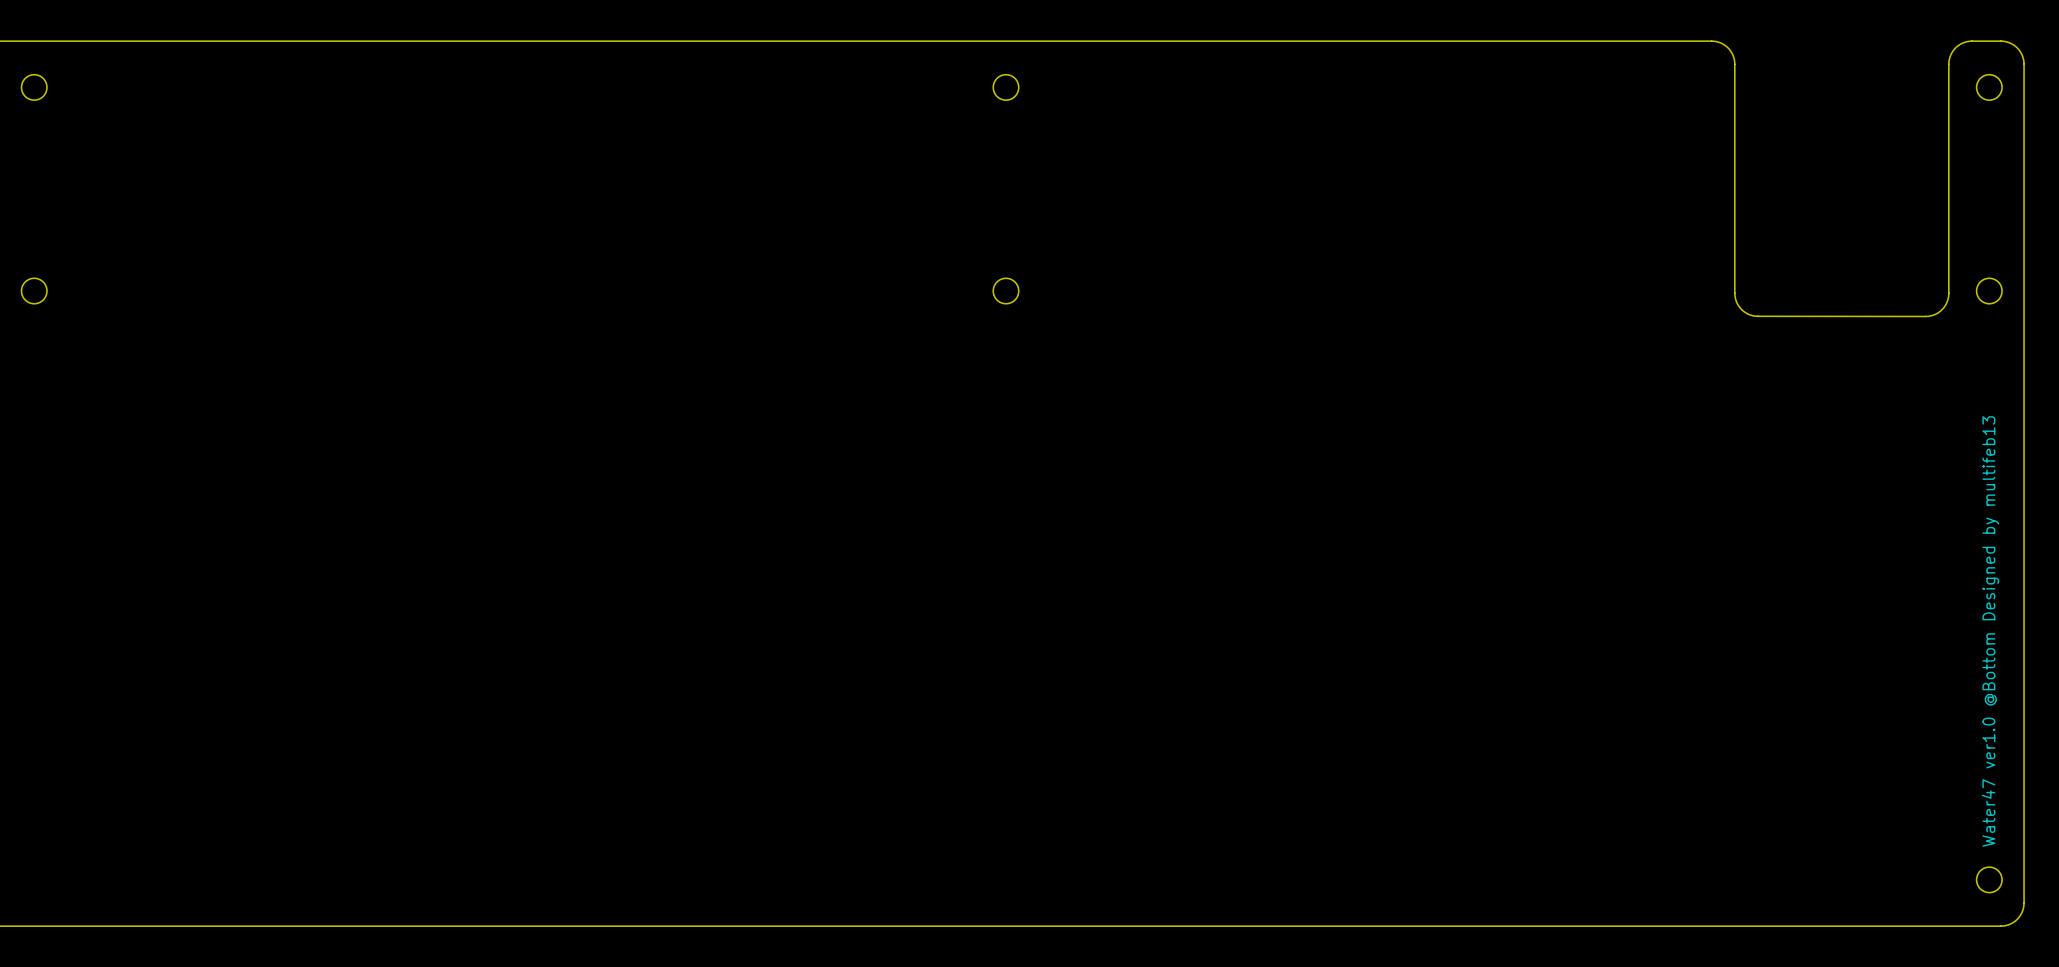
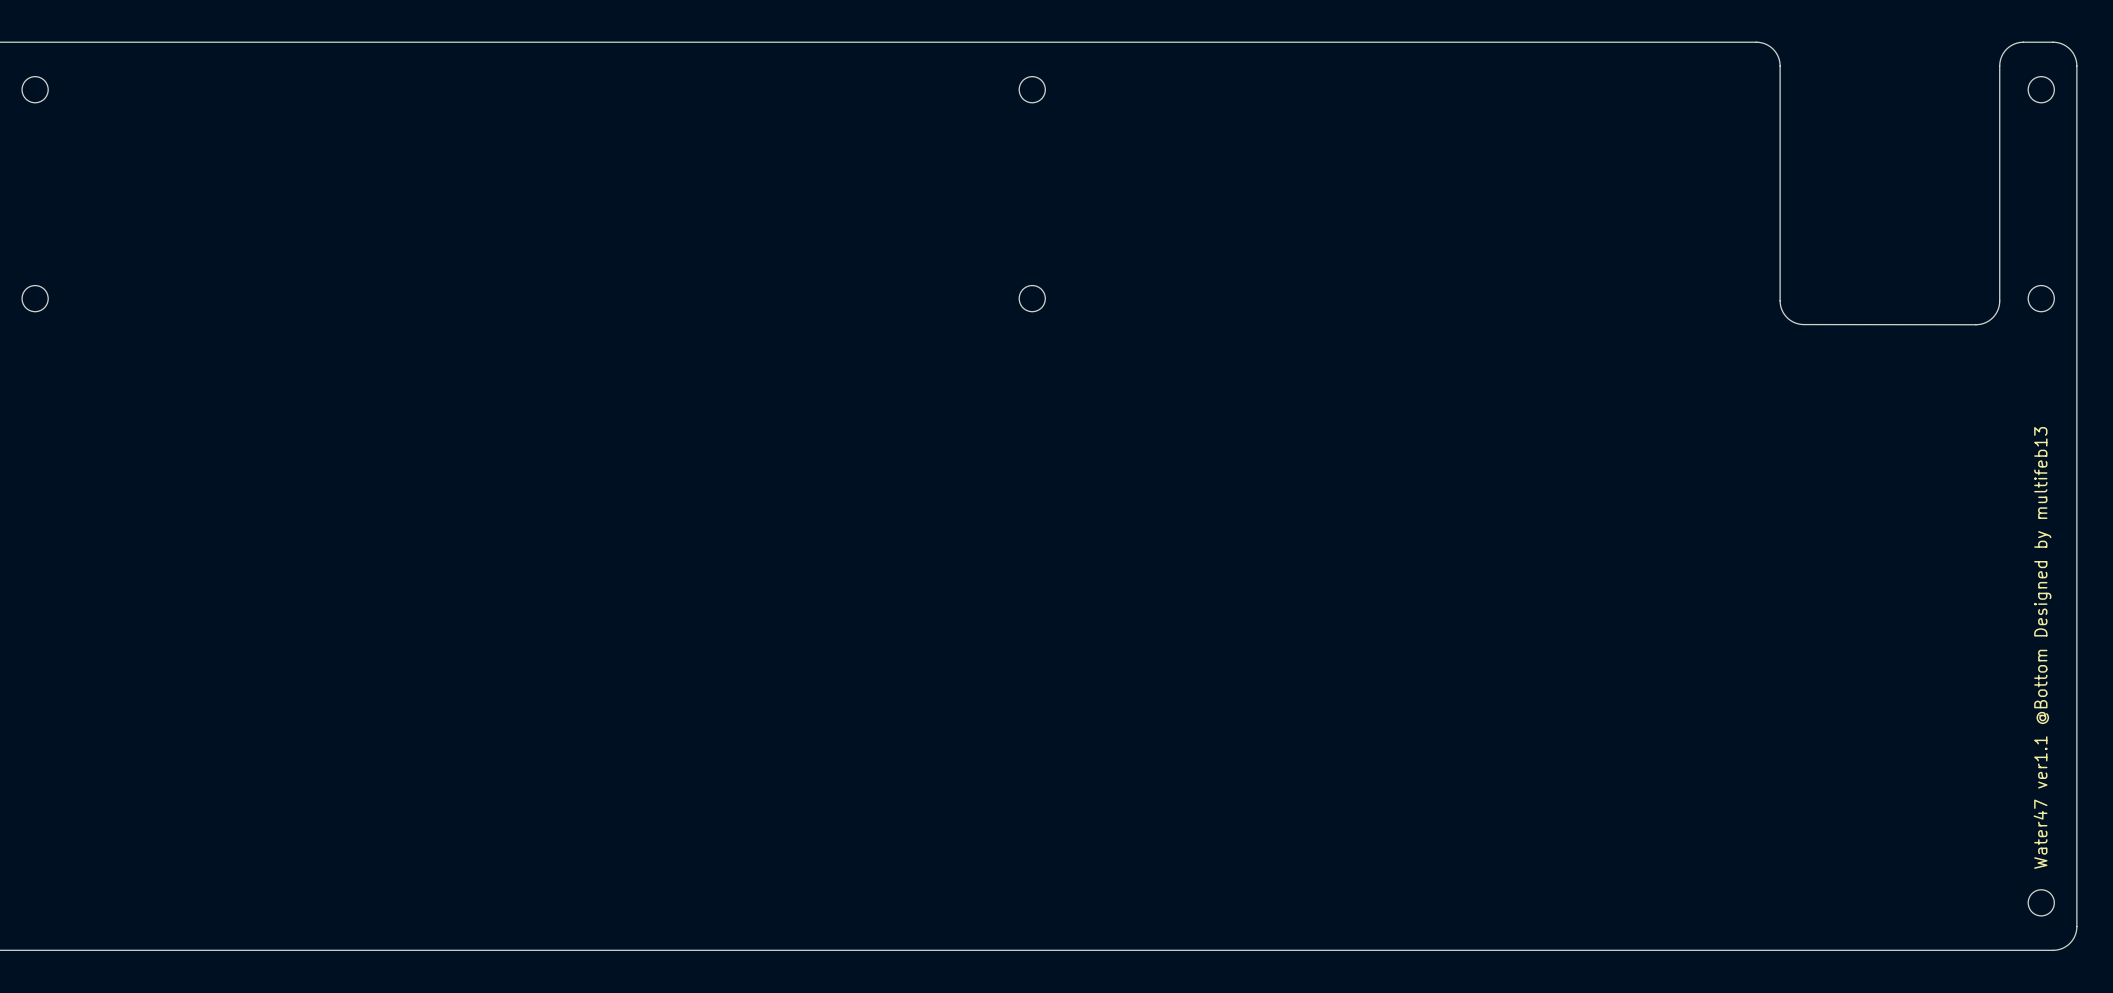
text: Water47 ver1.0 @Bottom Designed by multifeb13 (1990, 631) -> Water47 ver1.1 @Bottom Designed by multifeb13 (2042, 647)

